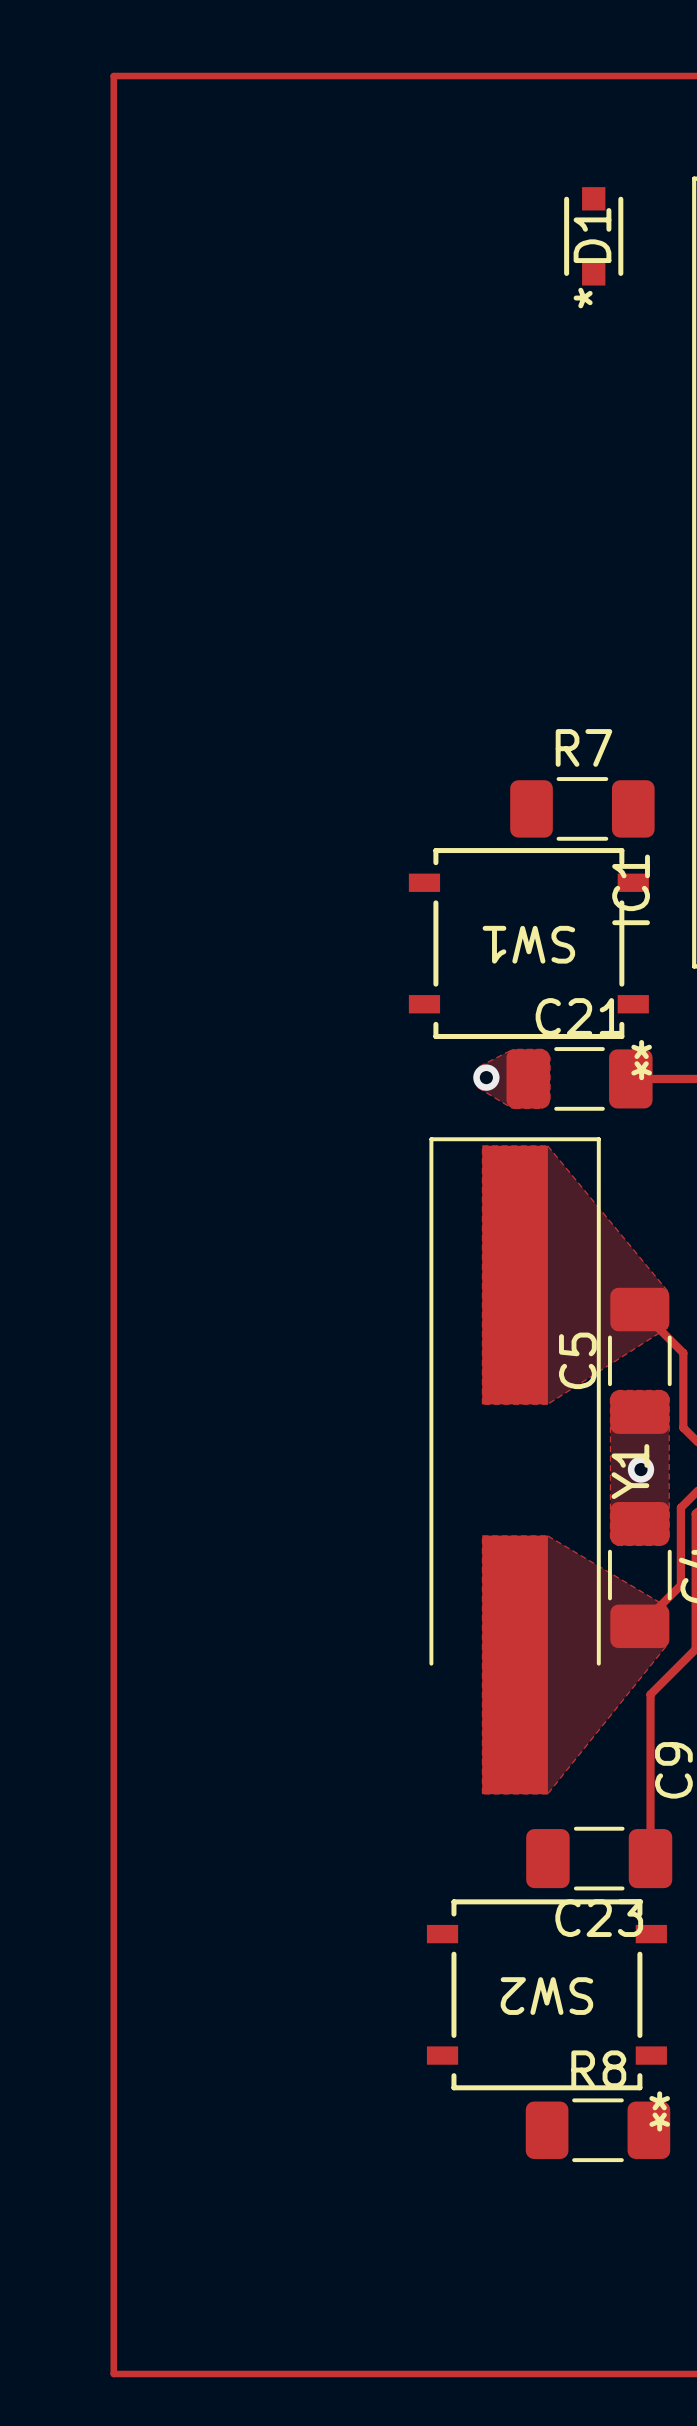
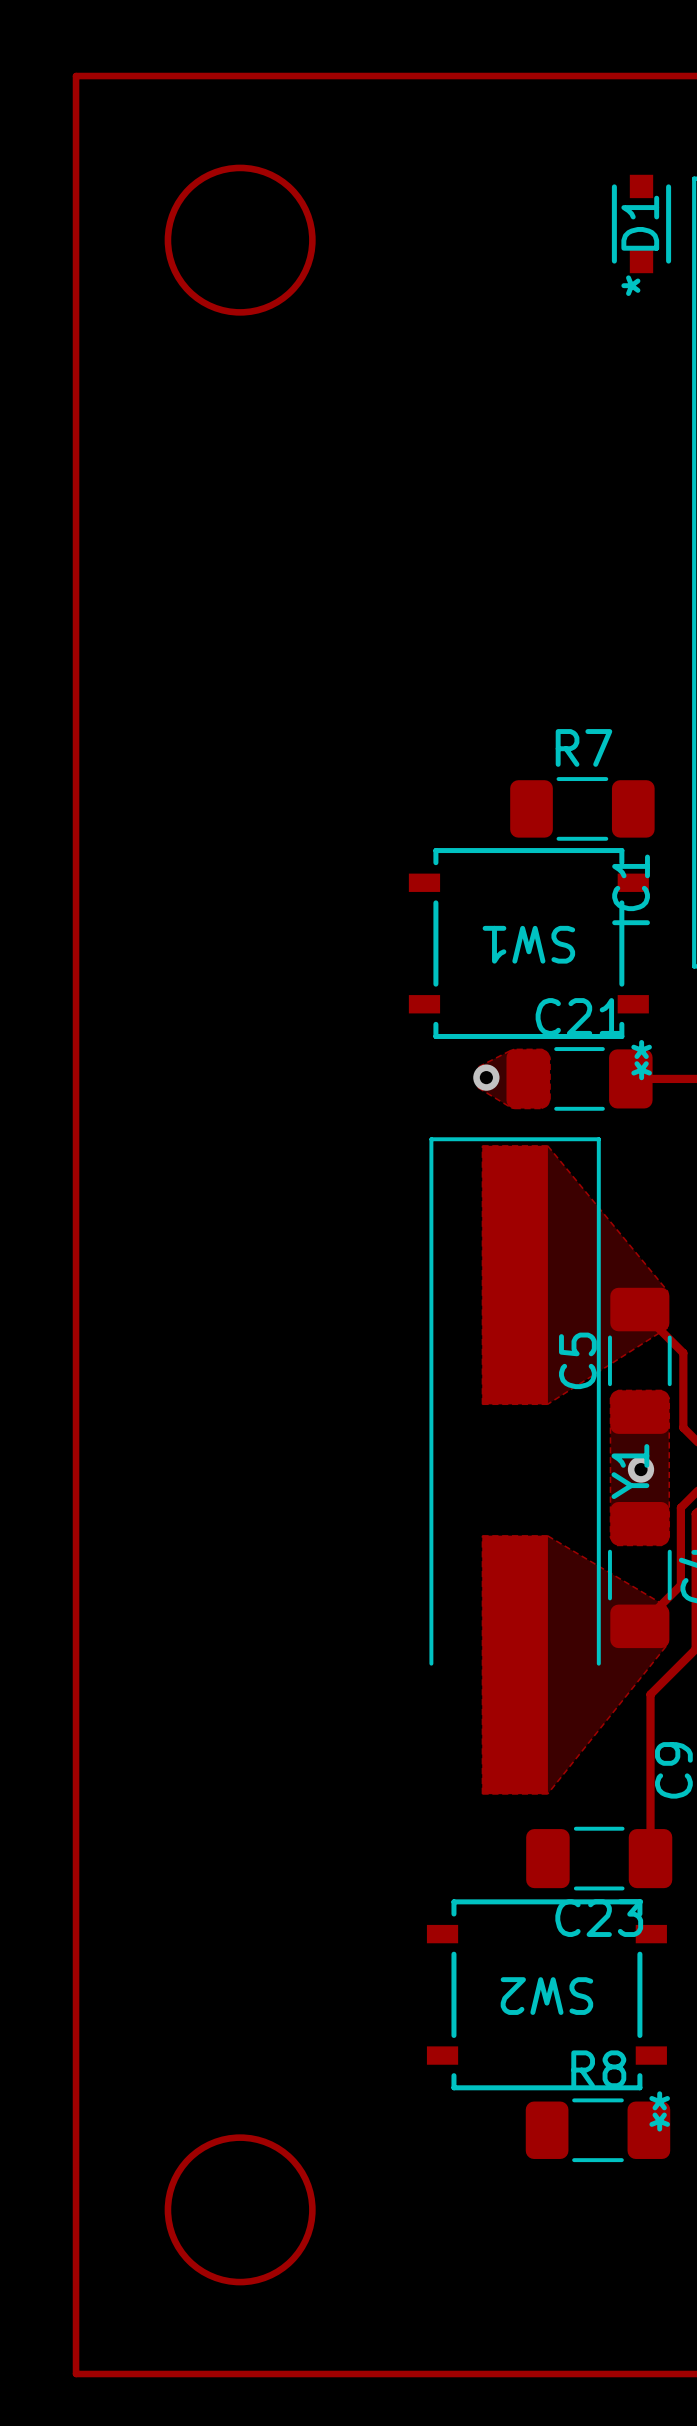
track: (113, 76) (113, 2373) -> (113, 76) (76, 76) (76, 2373) (113, 2373)
drawing: none -> [164, 164, 316, 316]
D1 position: (593, 236) -> (641, 223)
drawing: none -> [164, 2134, 316, 2286]

